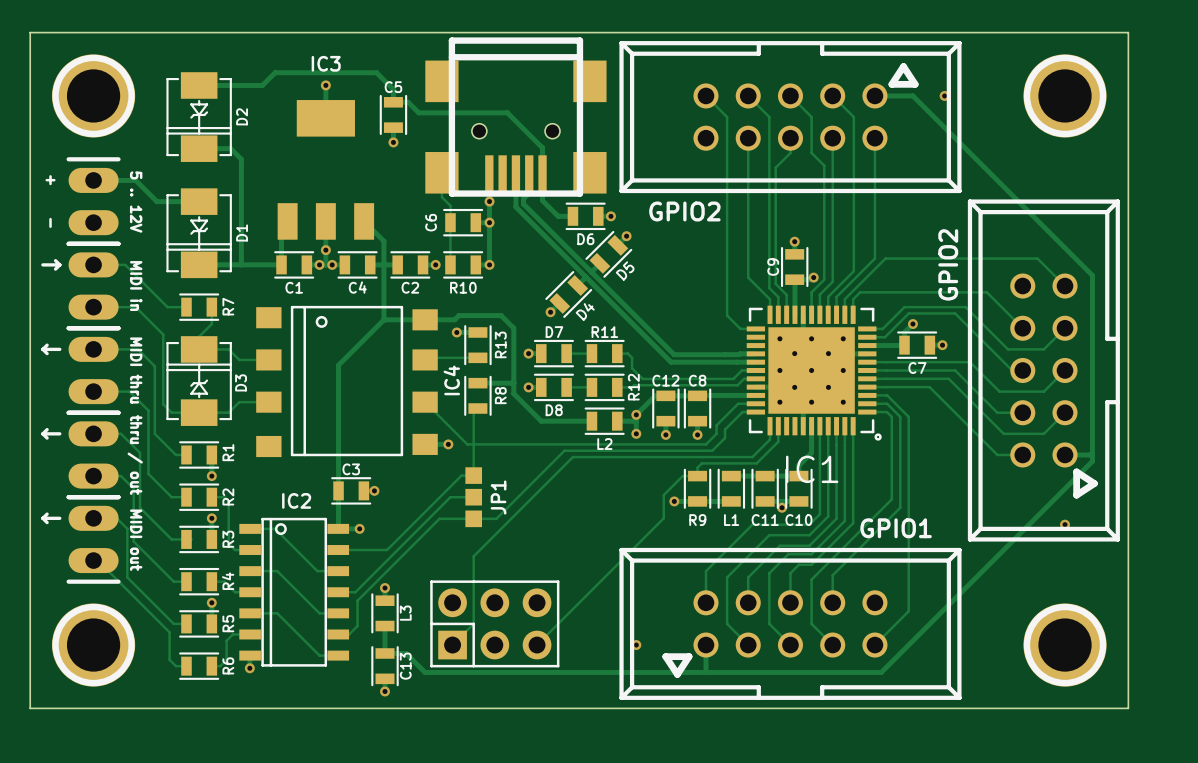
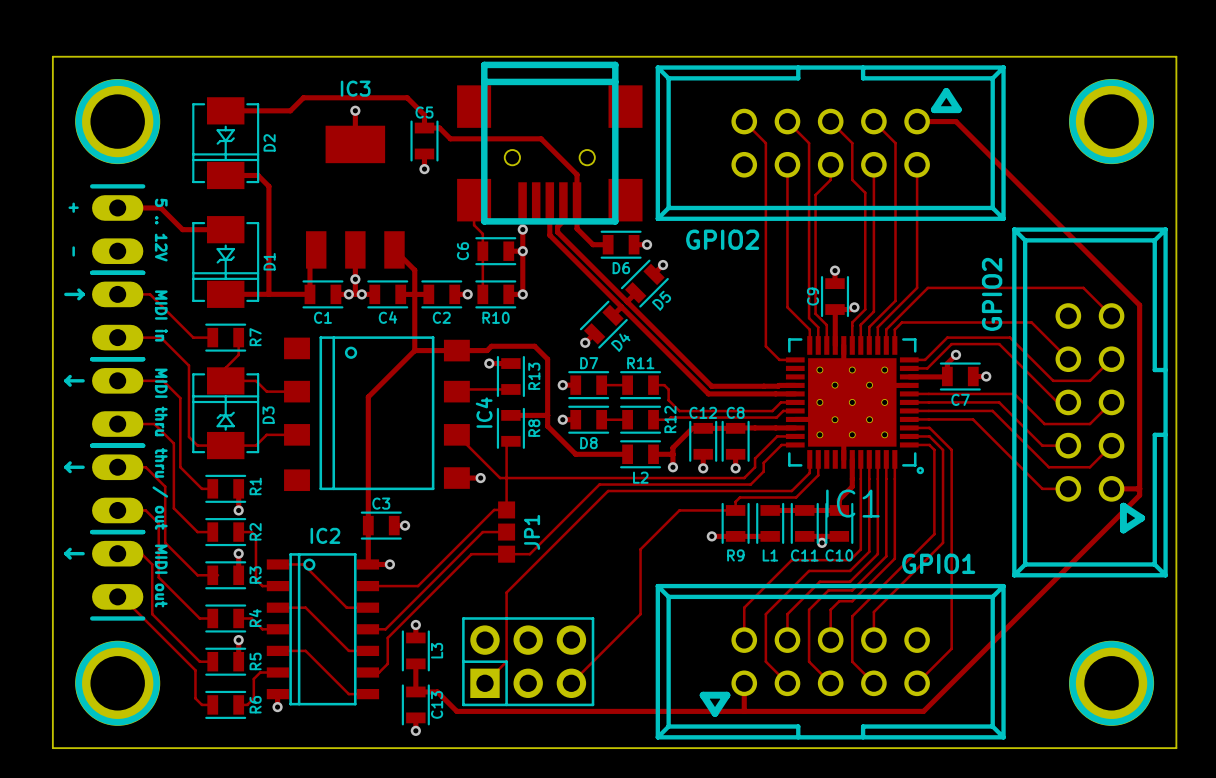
via: (944, 95) -> none
via: (636, 414) -> none
track: (682, 476) (663, 495) (663, 518) (604, 577) -> (720, 510) (679, 510) (640, 549) (640, 614)
via: (1065, 524) -> none
via: (636, 645) -> none

